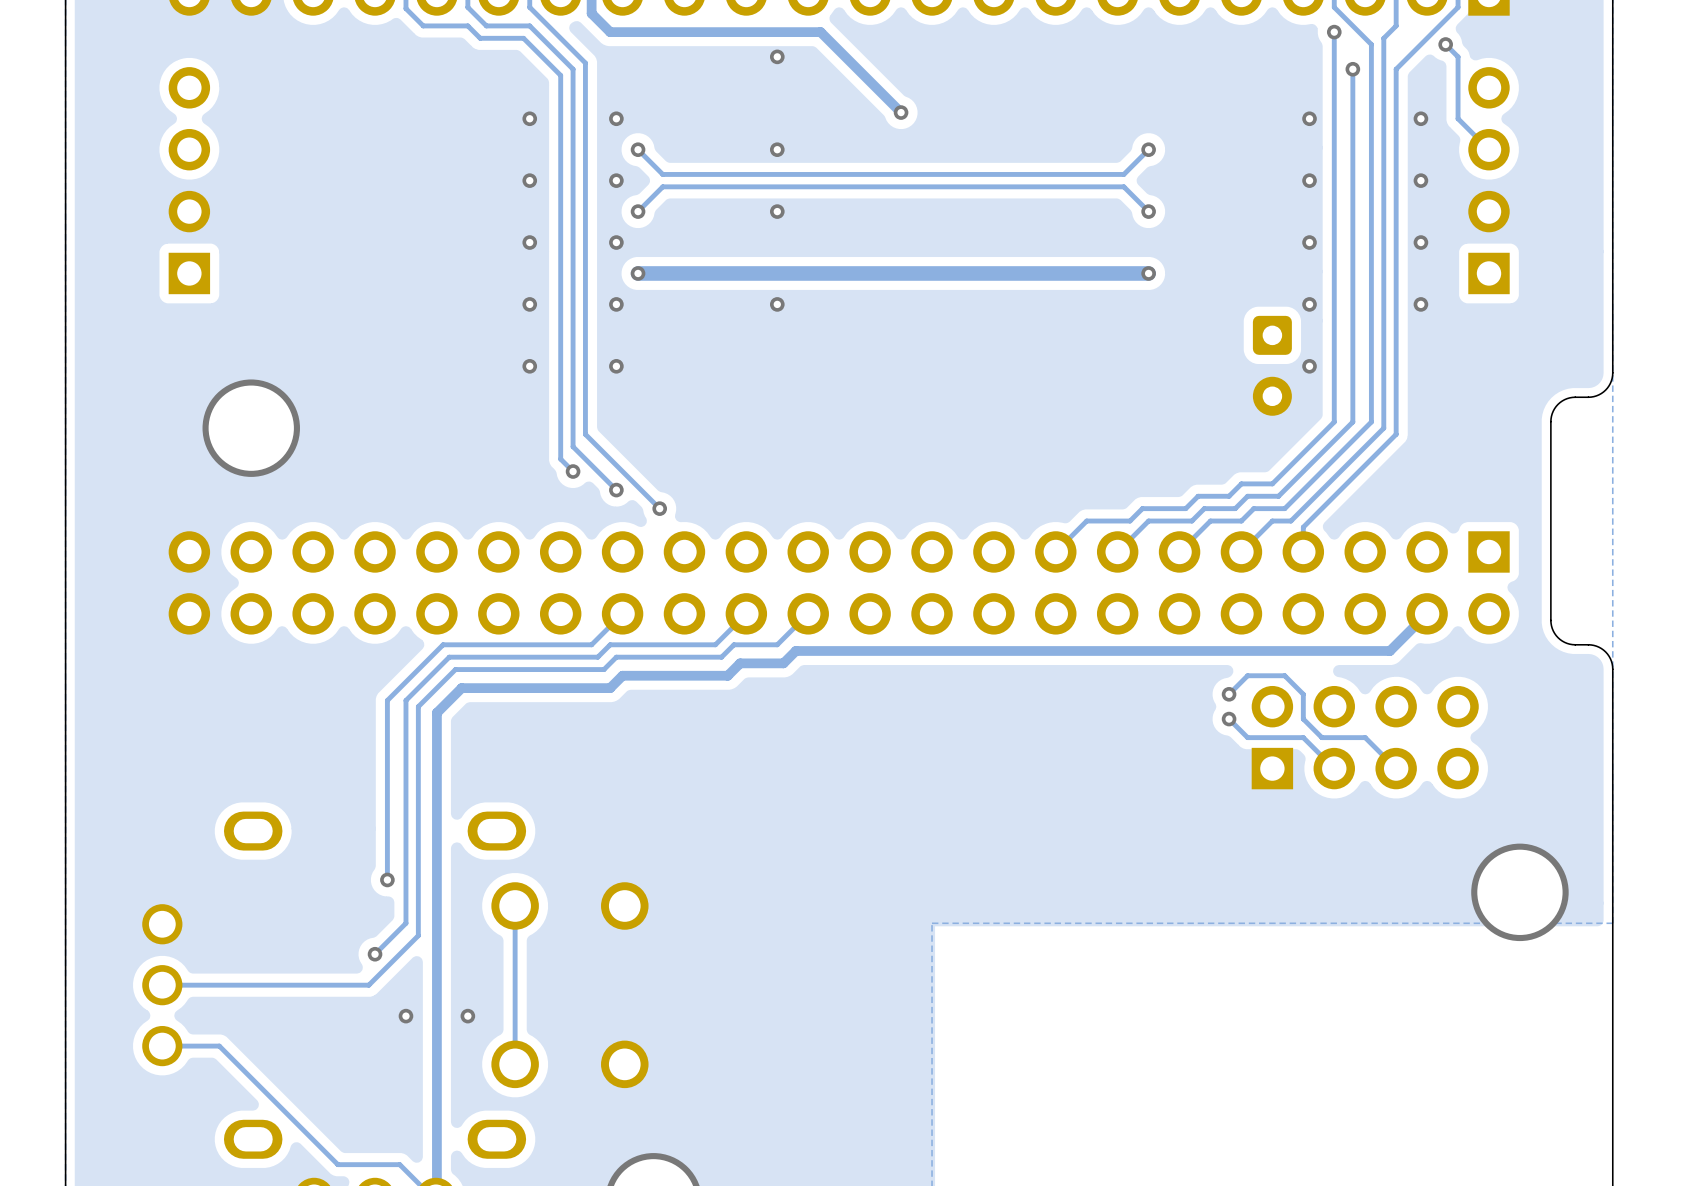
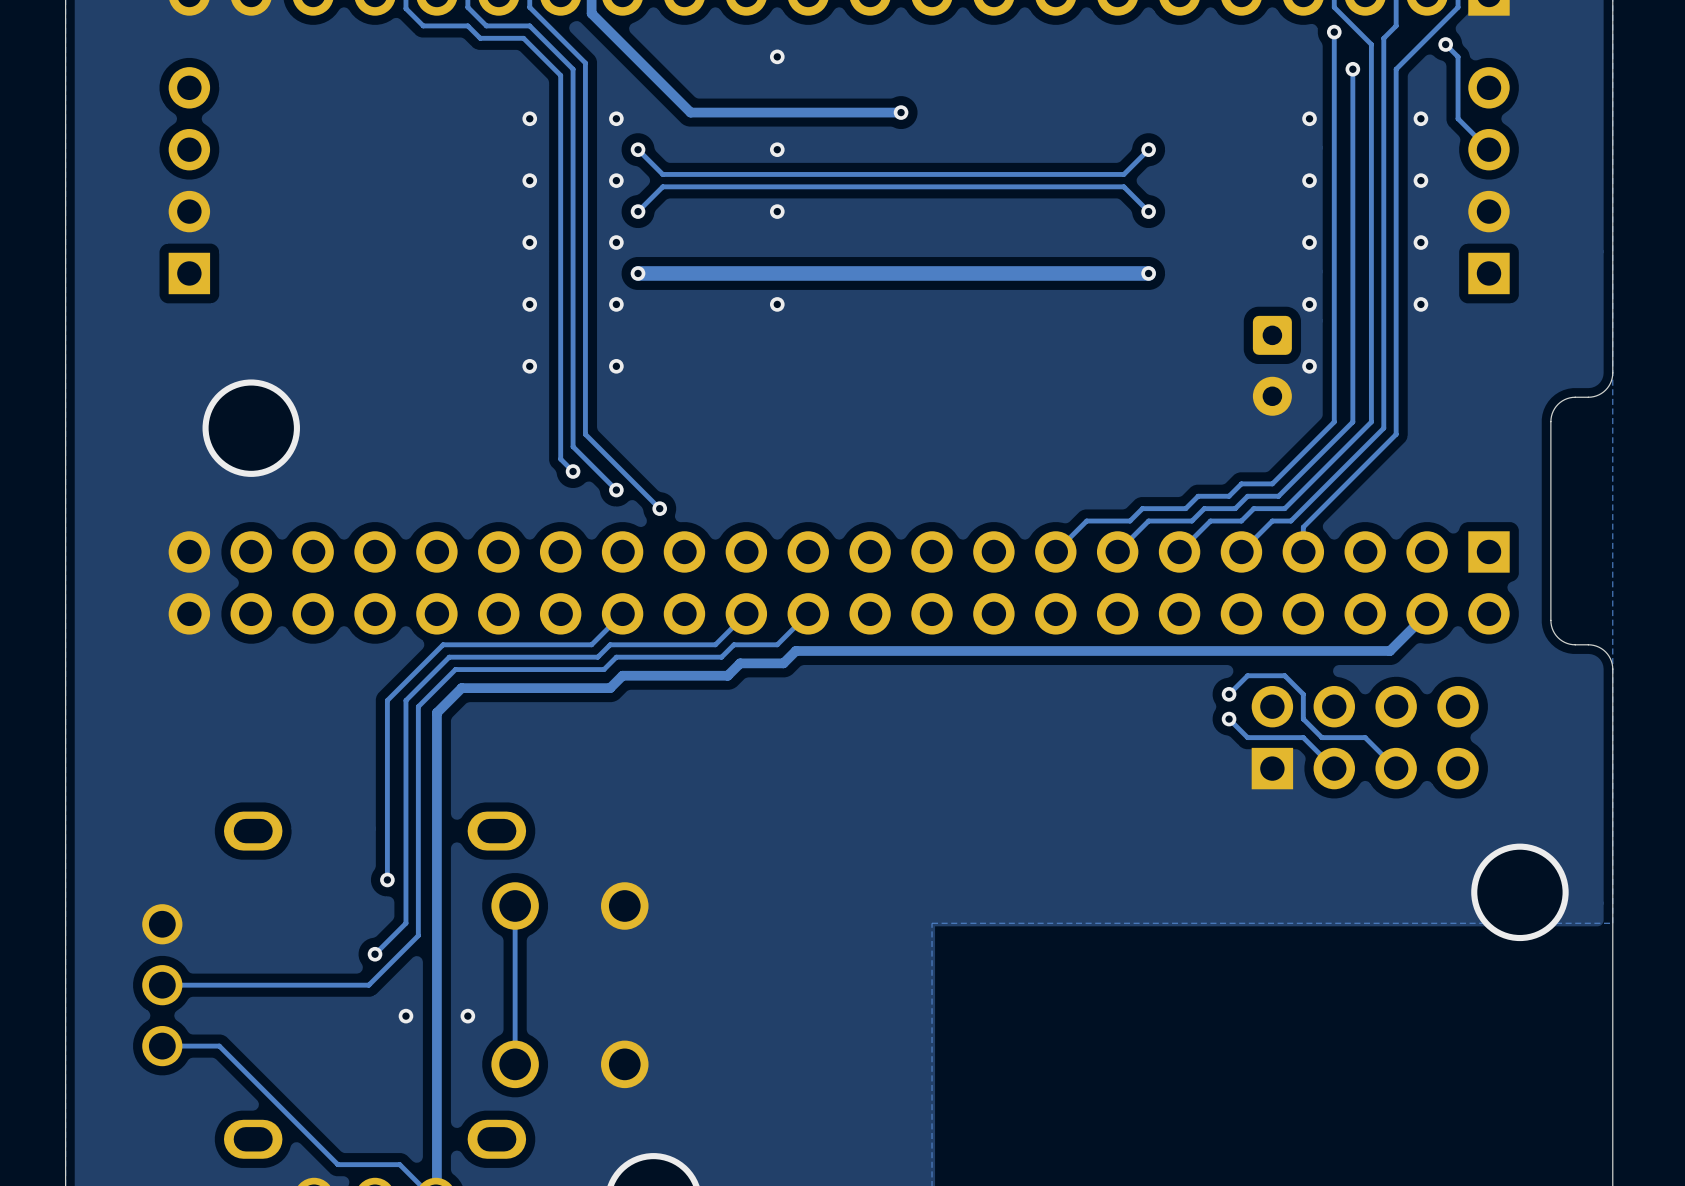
track: (610, 32) (820, 32) (901, 112) -> (610, 32) (690, 112) (901, 112)

